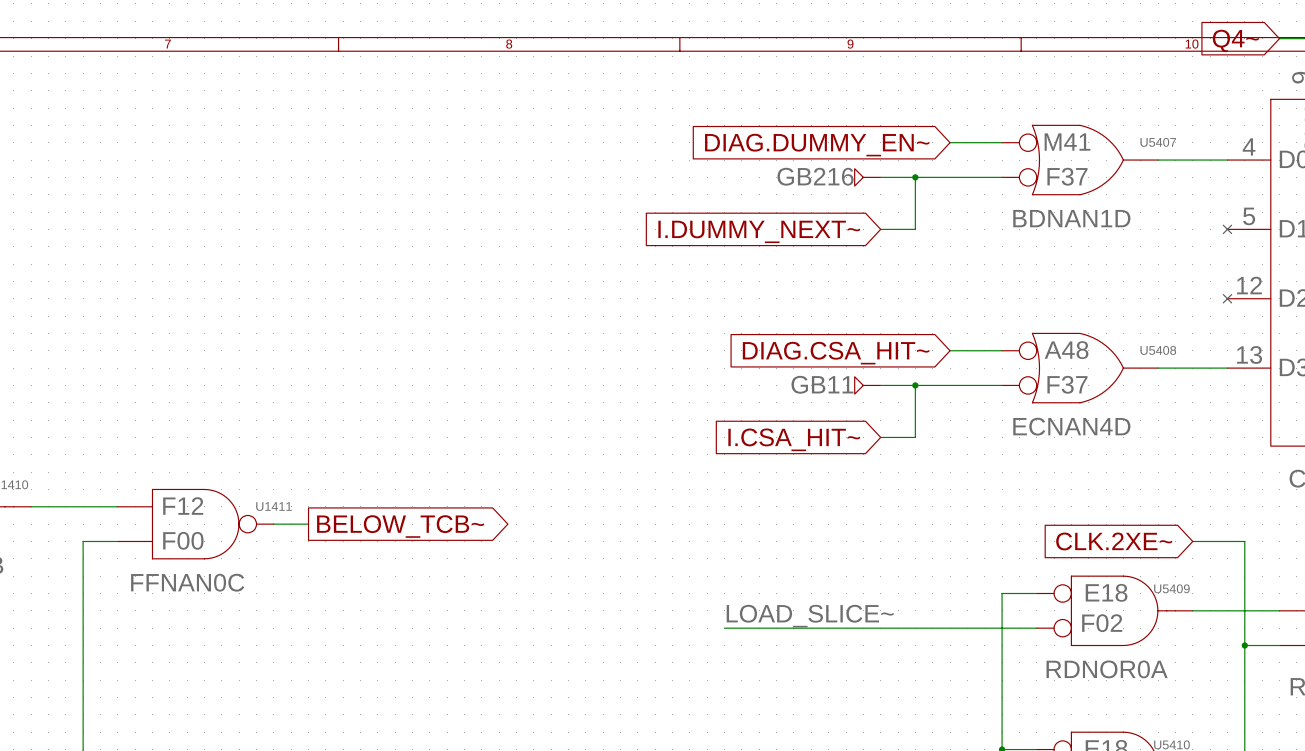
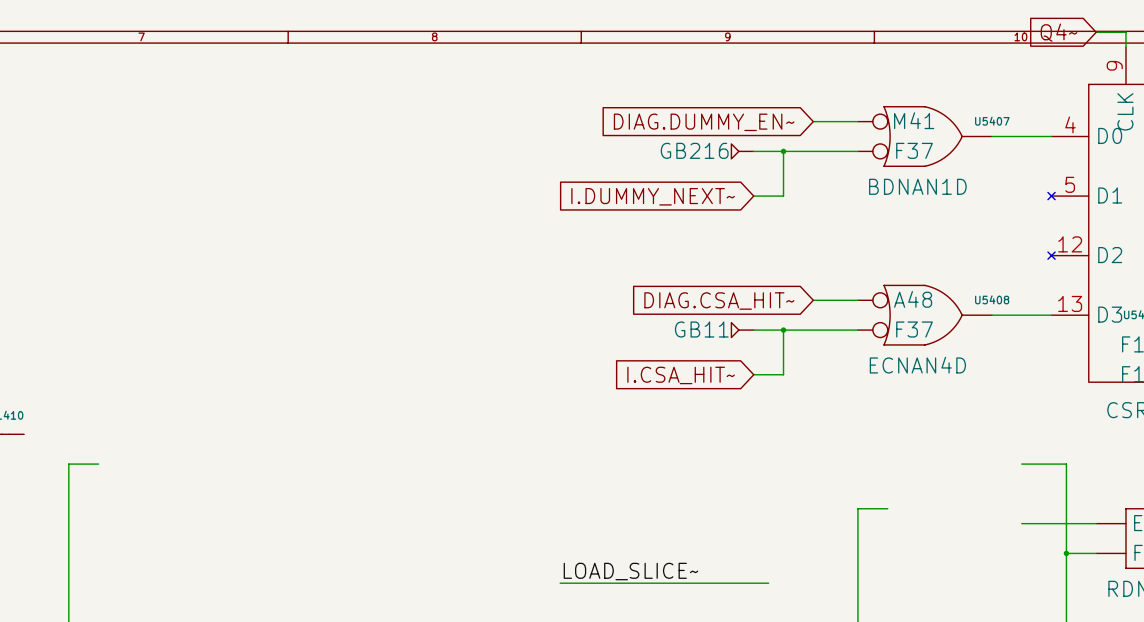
wire: (31, 506) (117, 506) -> none
U1411: F00 (195, 524) -> none
wire: (273, 524) (308, 524) -> none
global label: BELOW_TCB~ (400, 526) -> none
global label: CLK.2XE~ (1114, 541) -> none
U5409: F02 (1114, 610) -> none
label position: LOAD_SLICE~ (810, 616) -> LOAD_SLICE~ (630, 571)
wire: (724, 628) (1036, 628) -> none
wire: none -> (560, 583) (768, 583)

